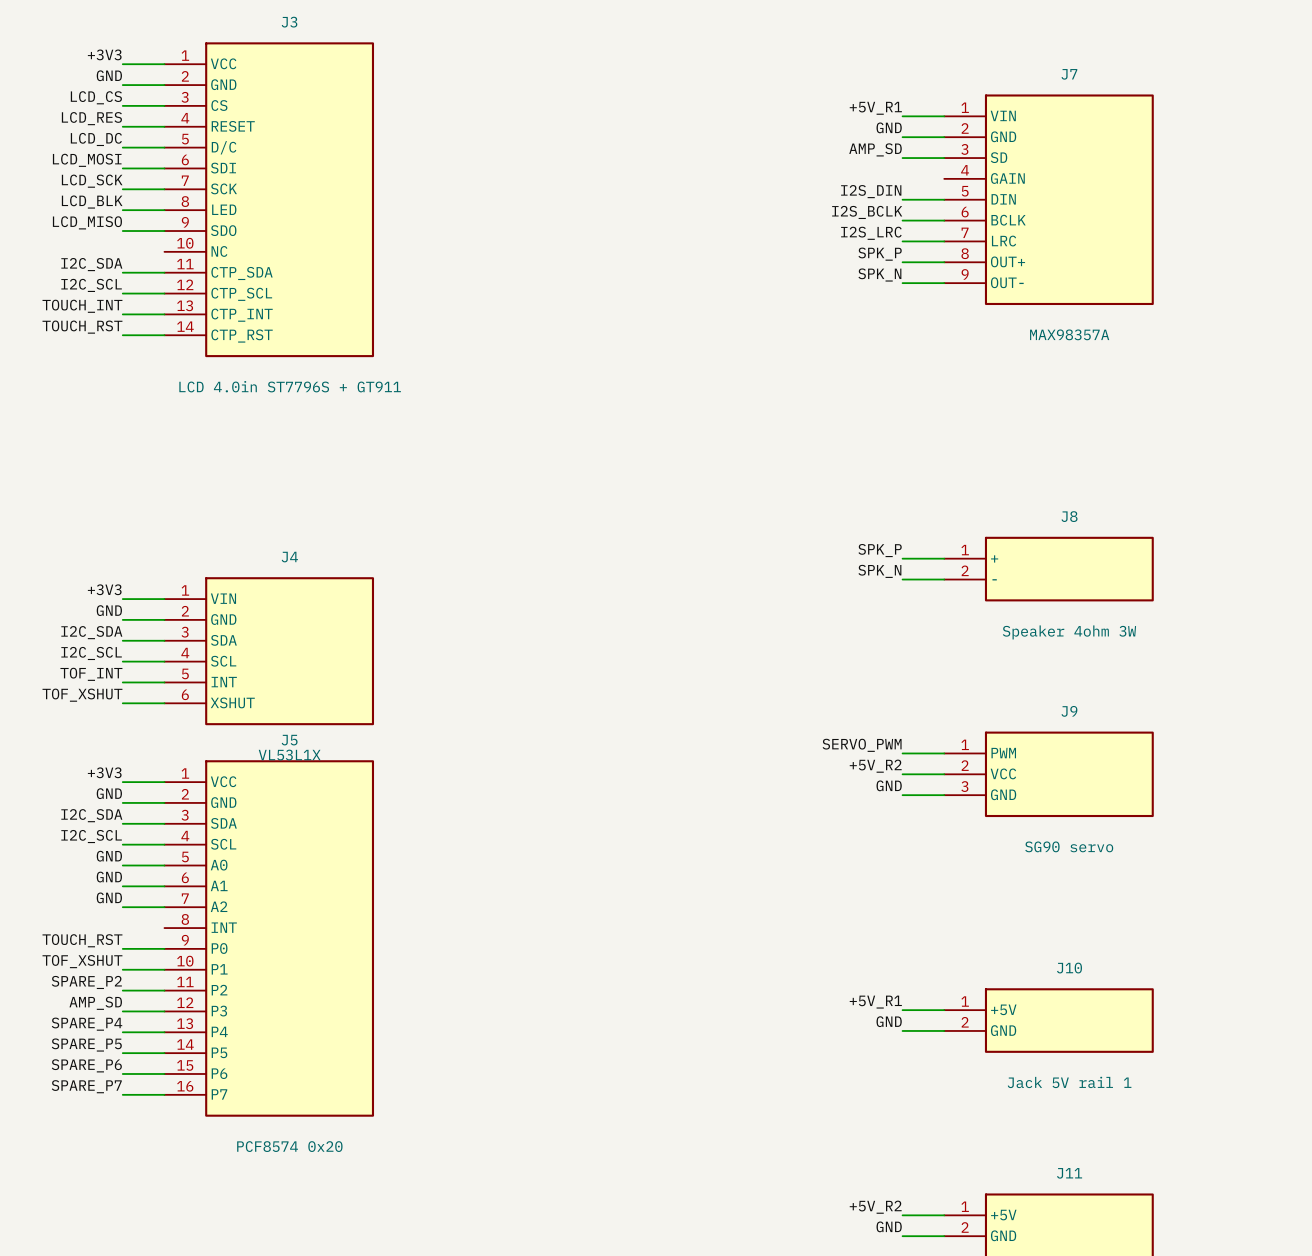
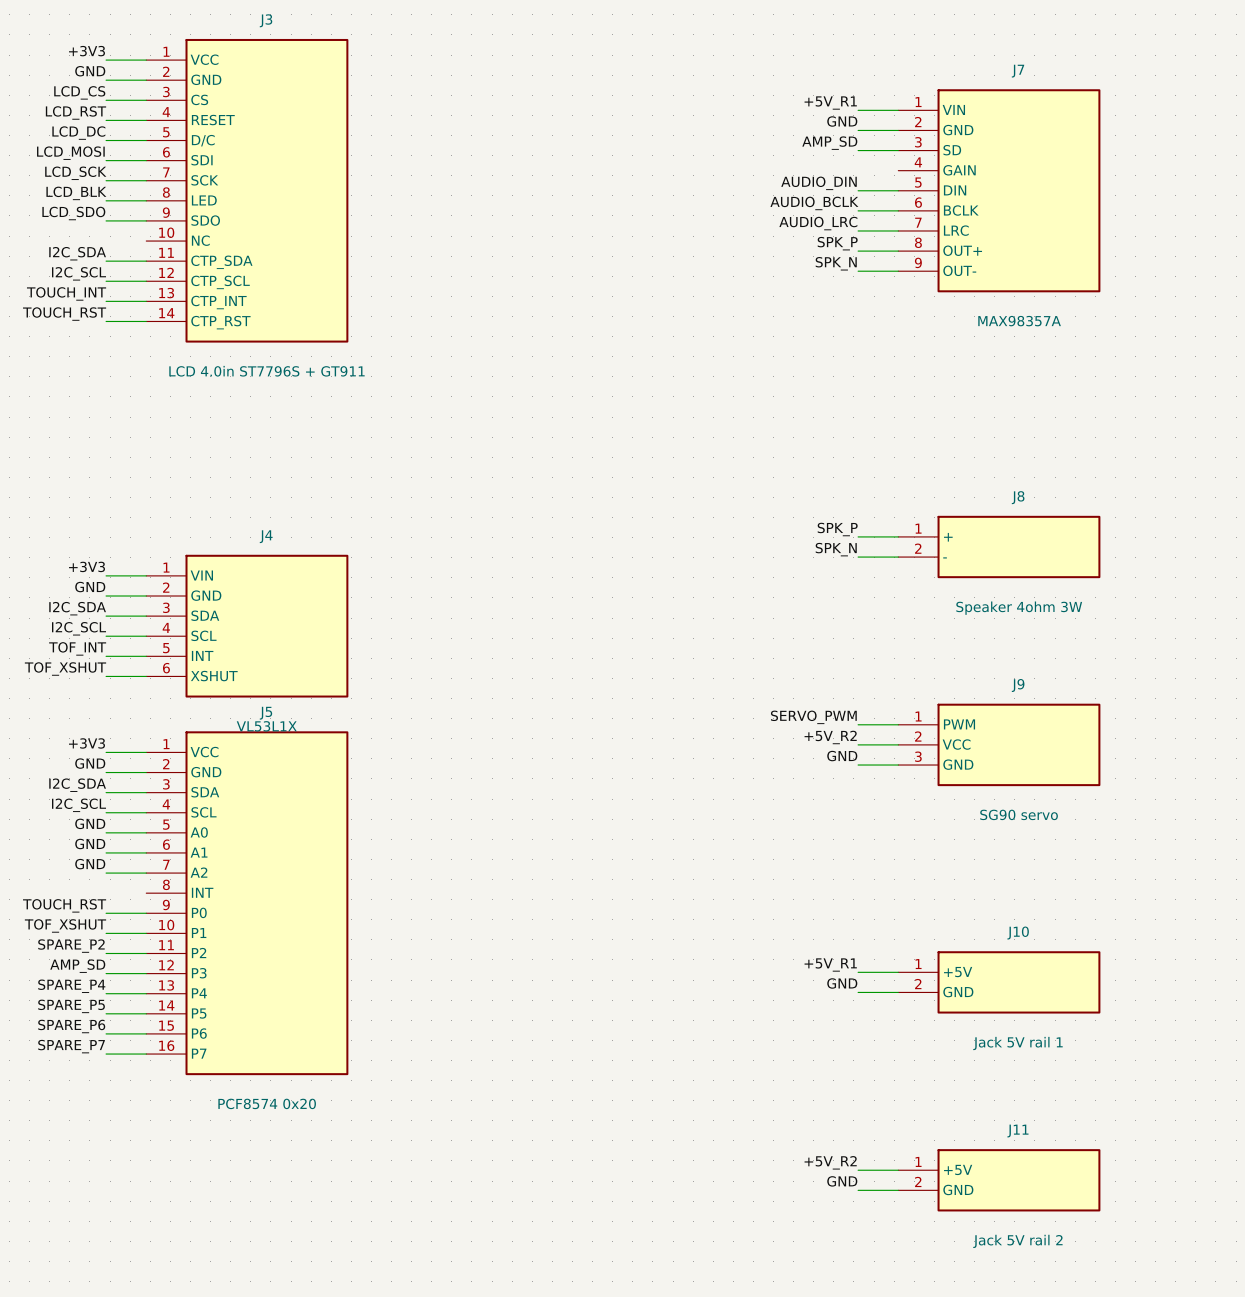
label: LCD_RES (91, 118) -> LCD_RST (75, 112)
label: I2S_DIN (871, 191) -> AUDIO_DIN (819, 183)
label: I2S_BCLK (867, 212) -> AUDIO_BCLK (814, 203)
label: LCD_MISO (87, 222) -> LCD_SDO (73, 213)
label: I2S_LRC (871, 233) -> AUDIO_LRC (818, 223)

